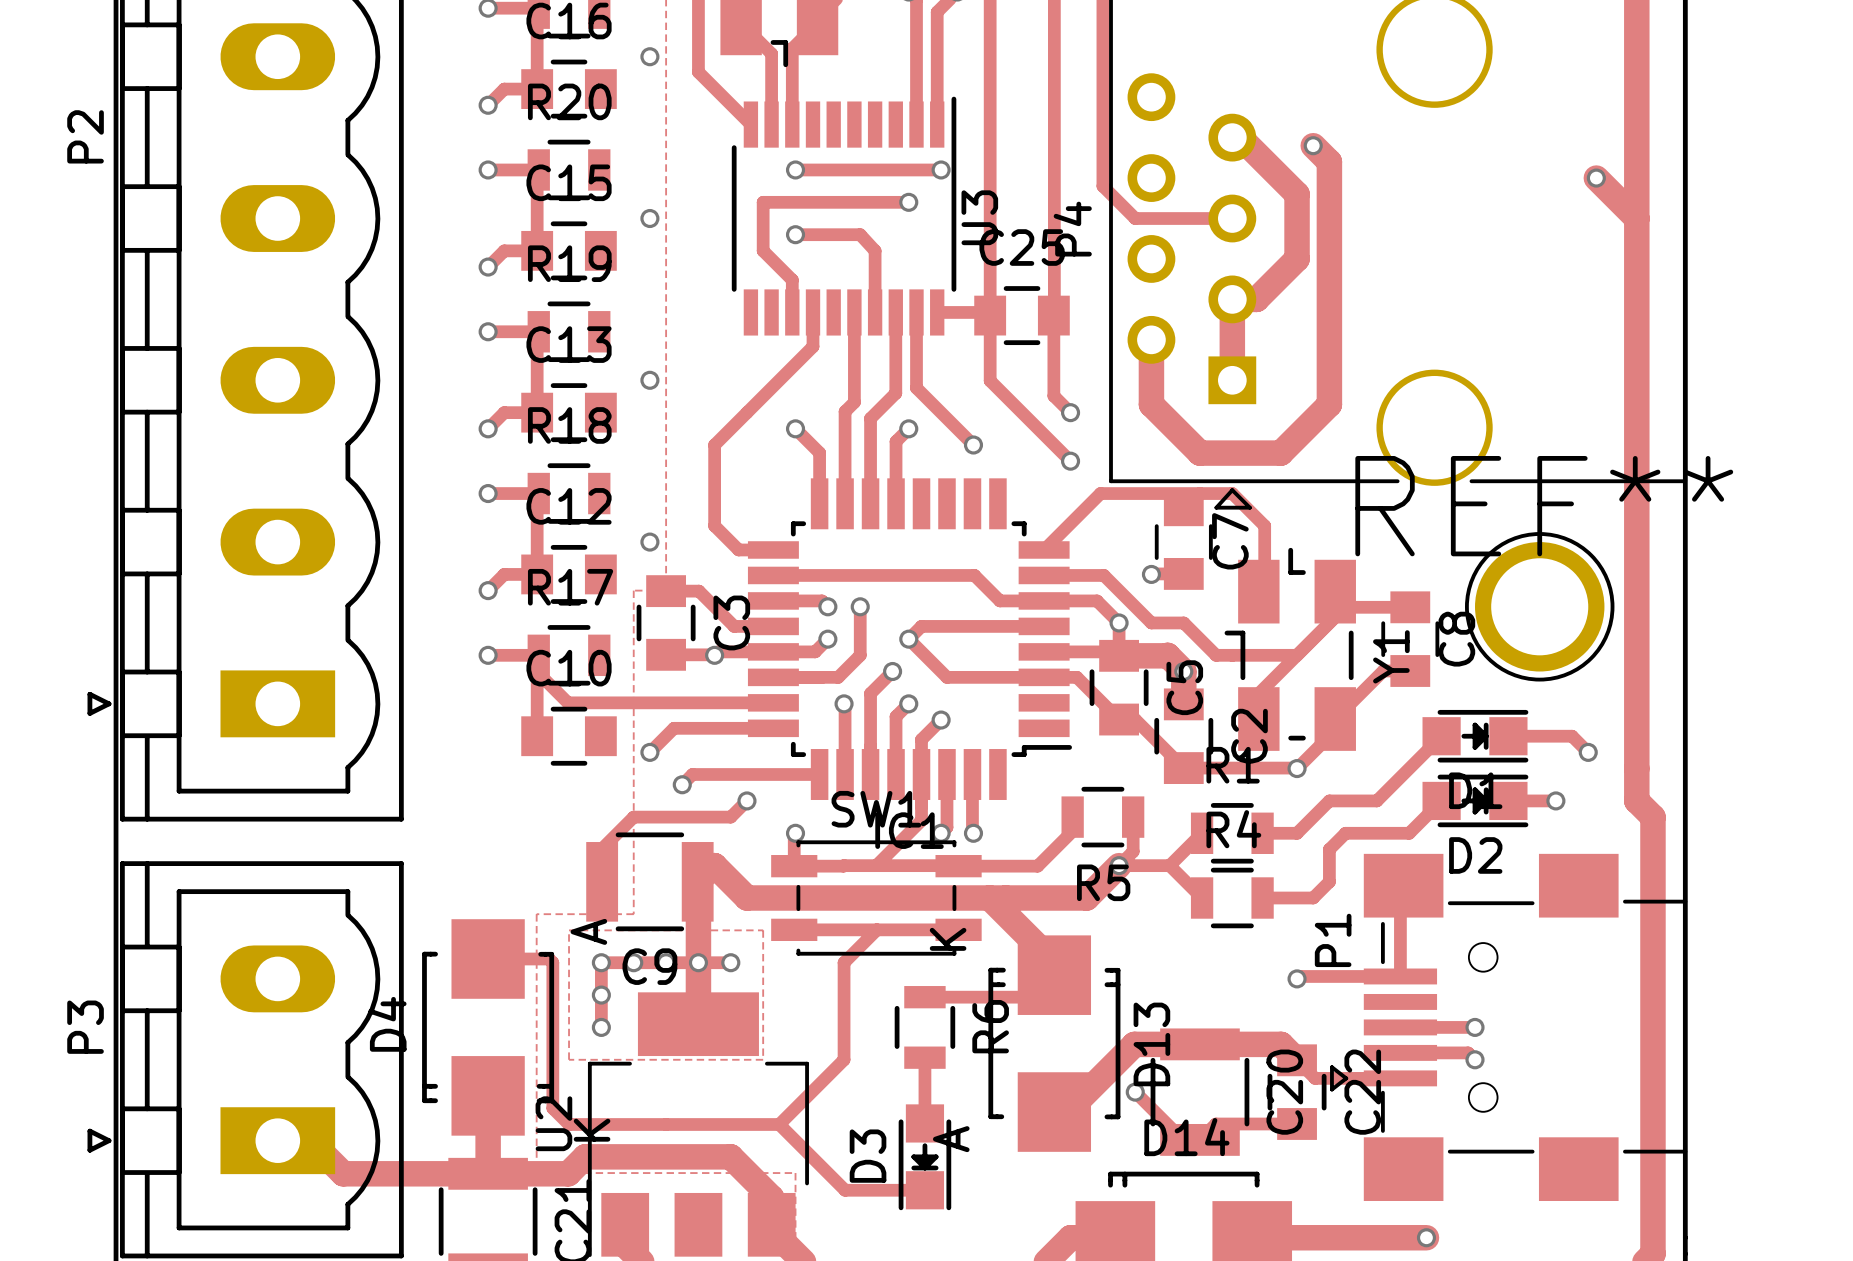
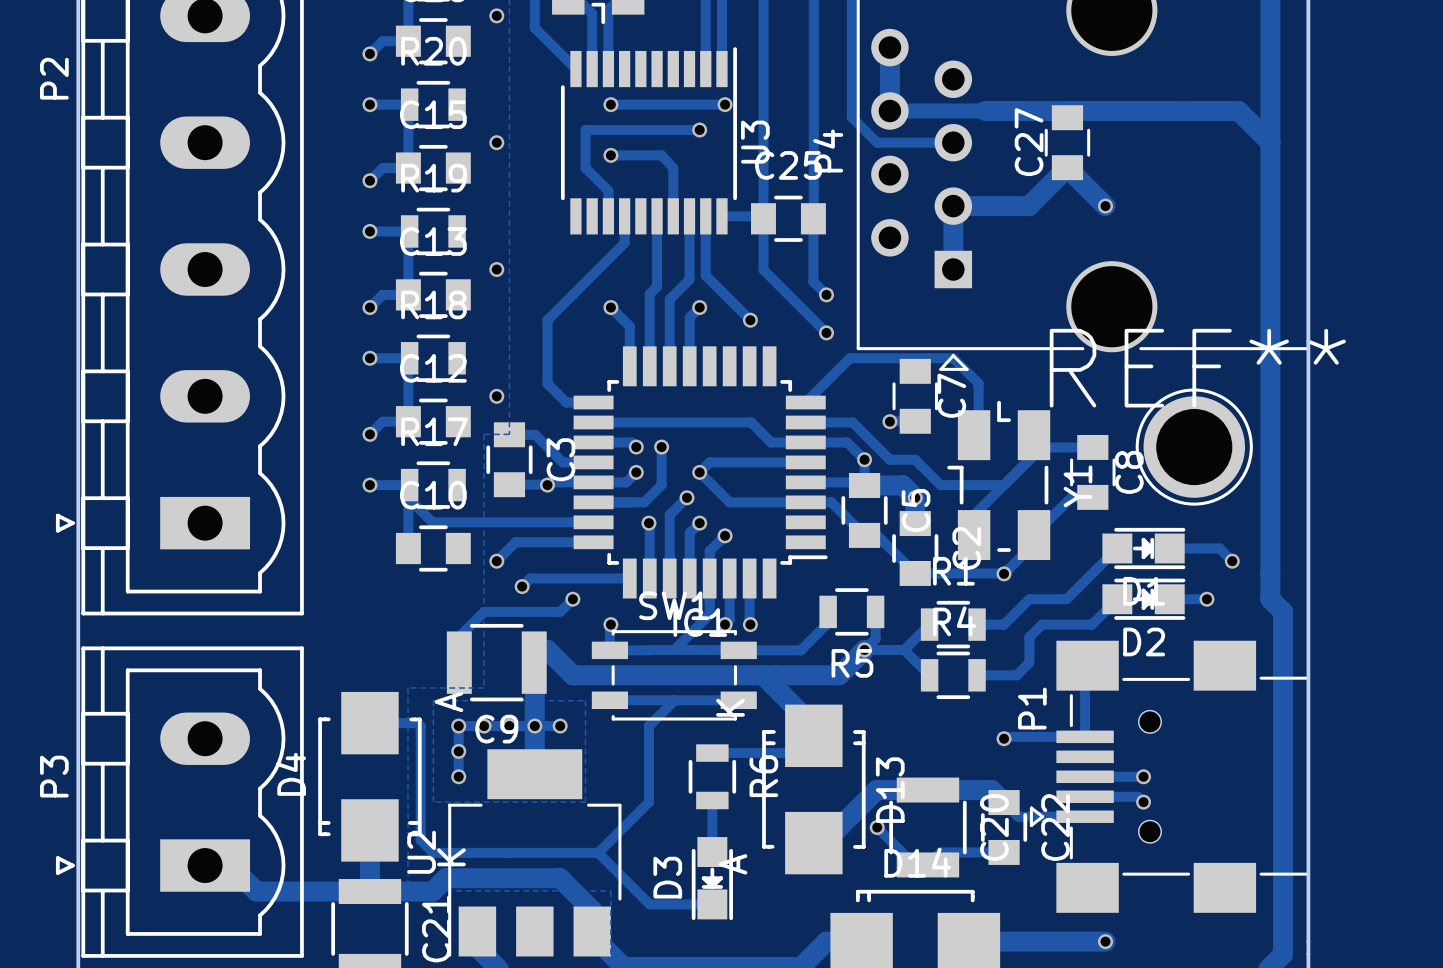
track: none -> (889, 47) (889, 110) (1238, 110)
track: (1232, 137) (1240, 137) (1297, 194) (1297, 258) (1256, 299) -> (1067, 167) (1029, 206) (972, 206)
track: (1313, 145) (1329, 161) (1329, 404) (1280, 453) (1199, 453) (1151, 404) (1151, 339) -> none
via: (1313, 145) -> none
via: (1596, 178) -> none
C27: none -> (1067, 142)
track: none -> (1067, 168) (1105, 206)
via: none -> (1105, 206)

